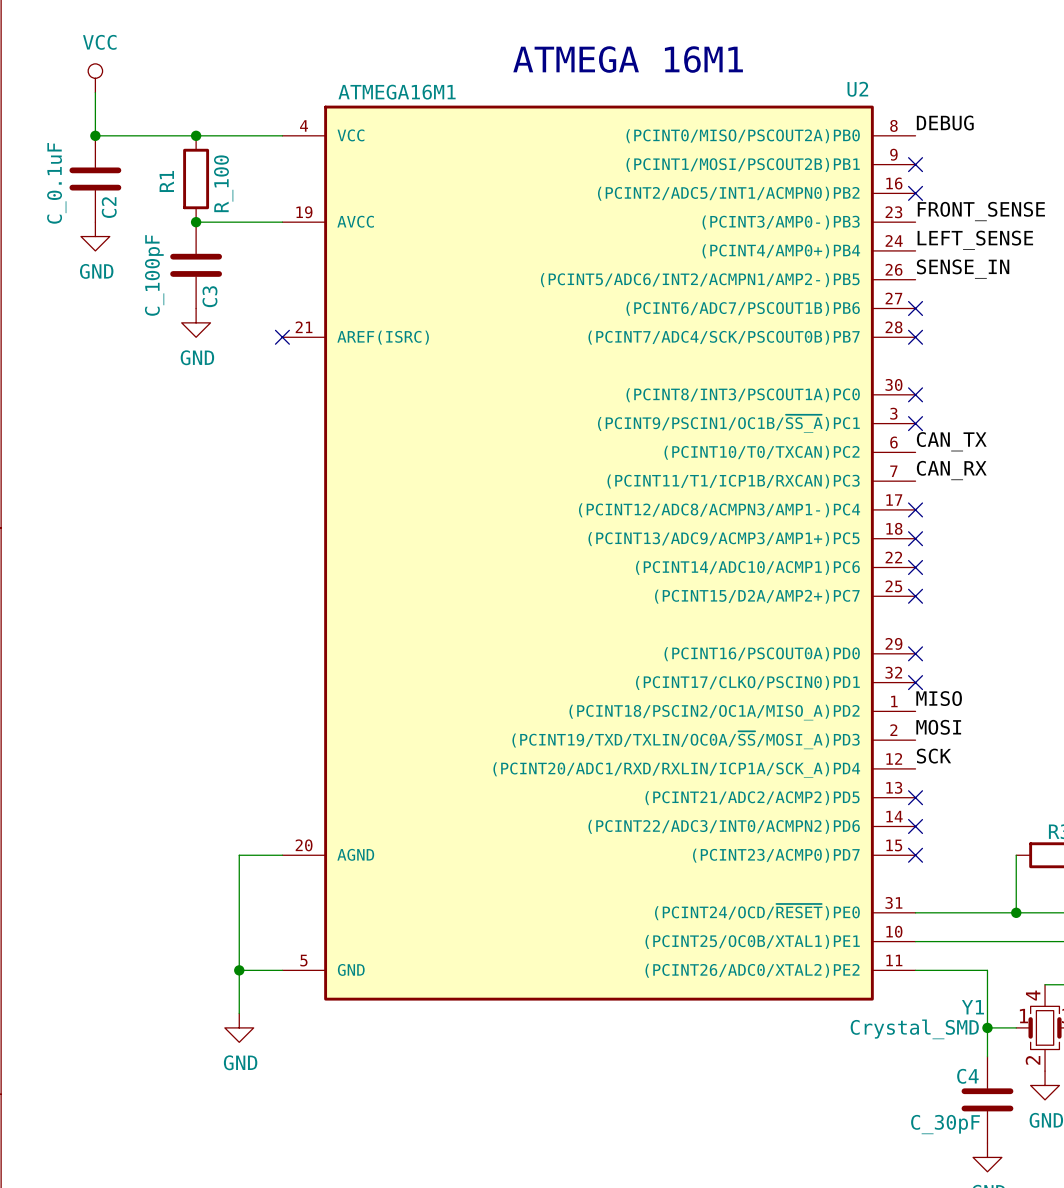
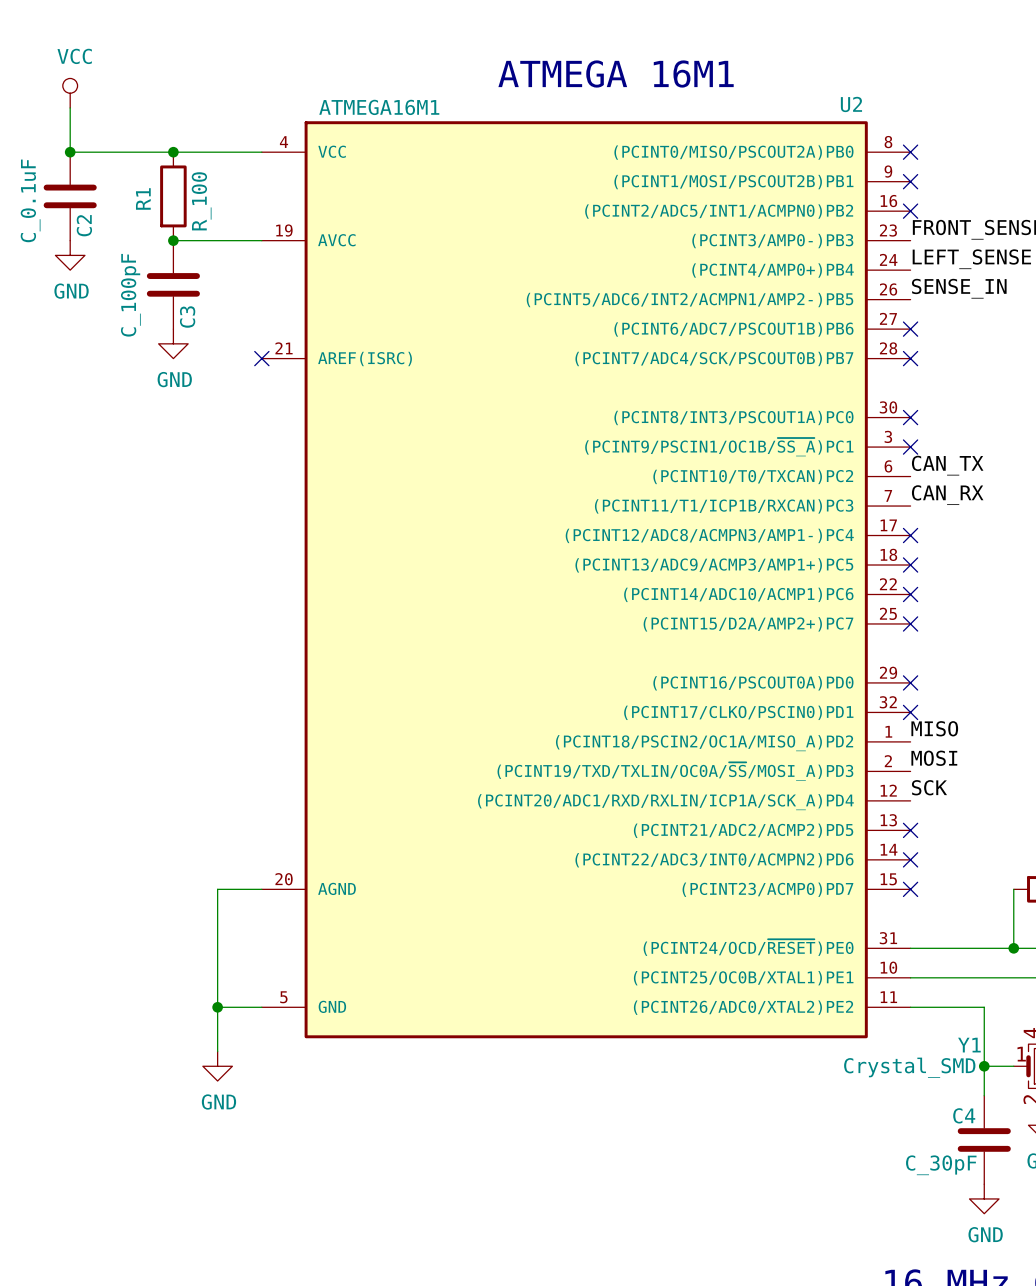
label: DEBUG (945, 123) -> none
no-connect mark: none -> (910, 152)

